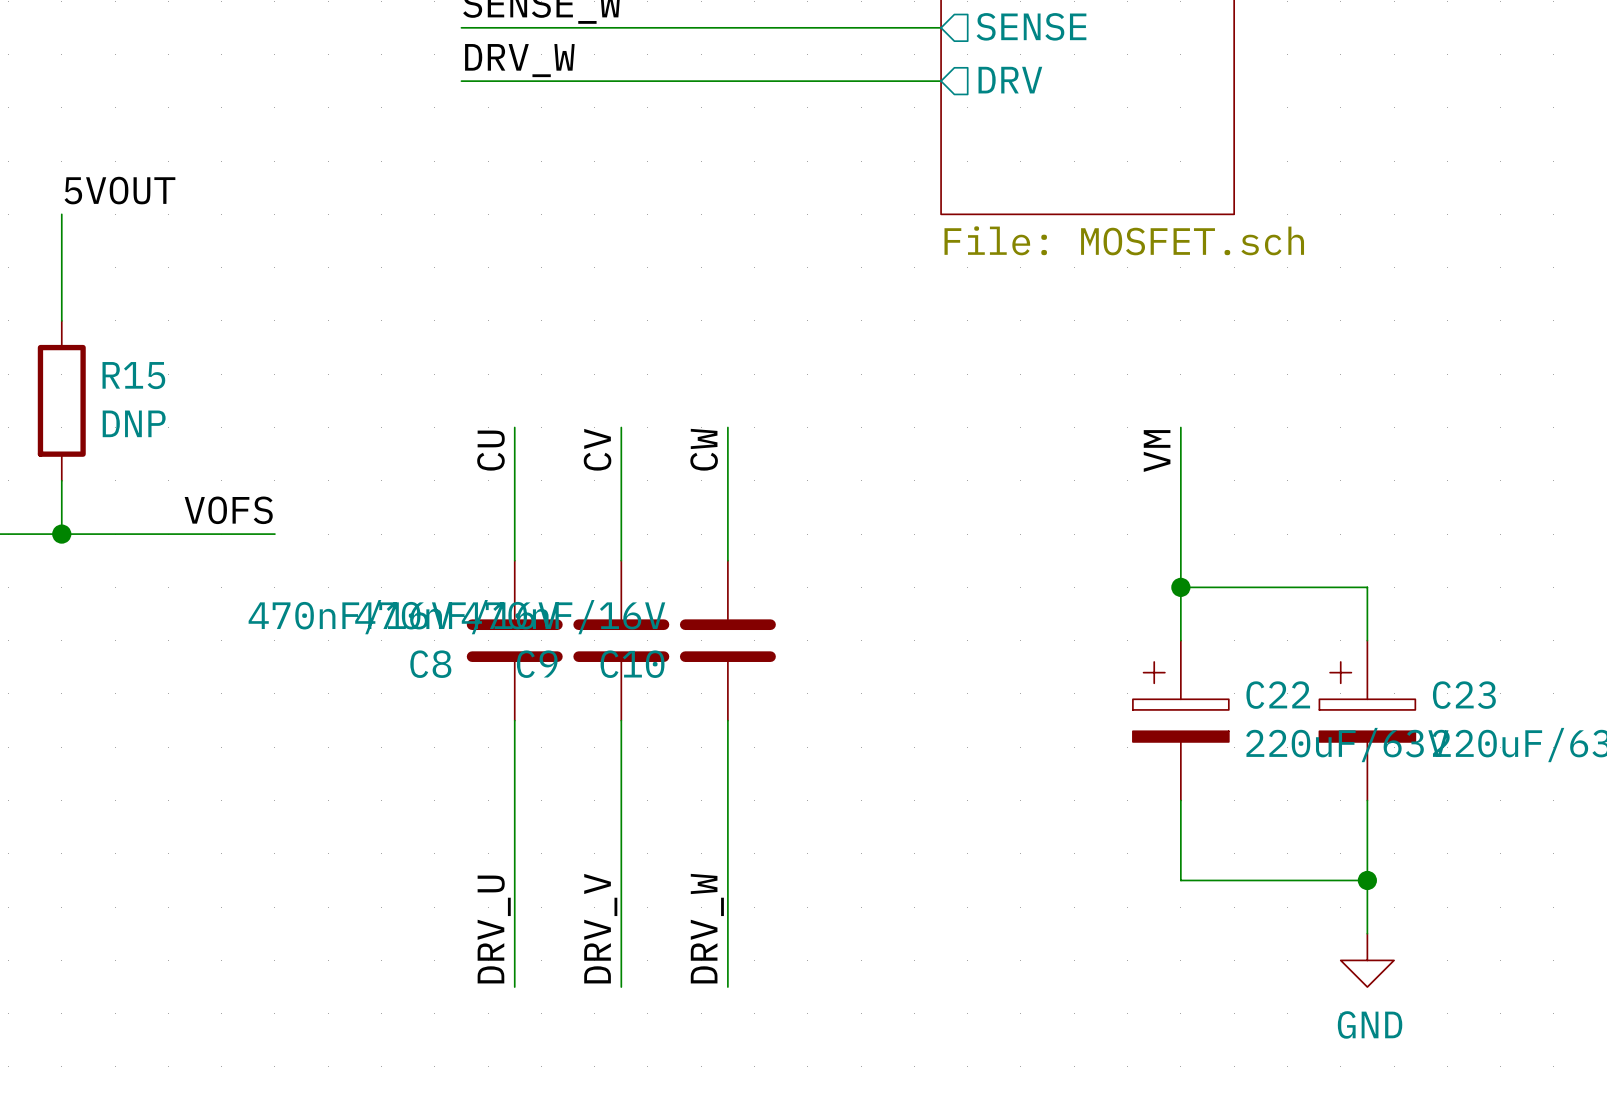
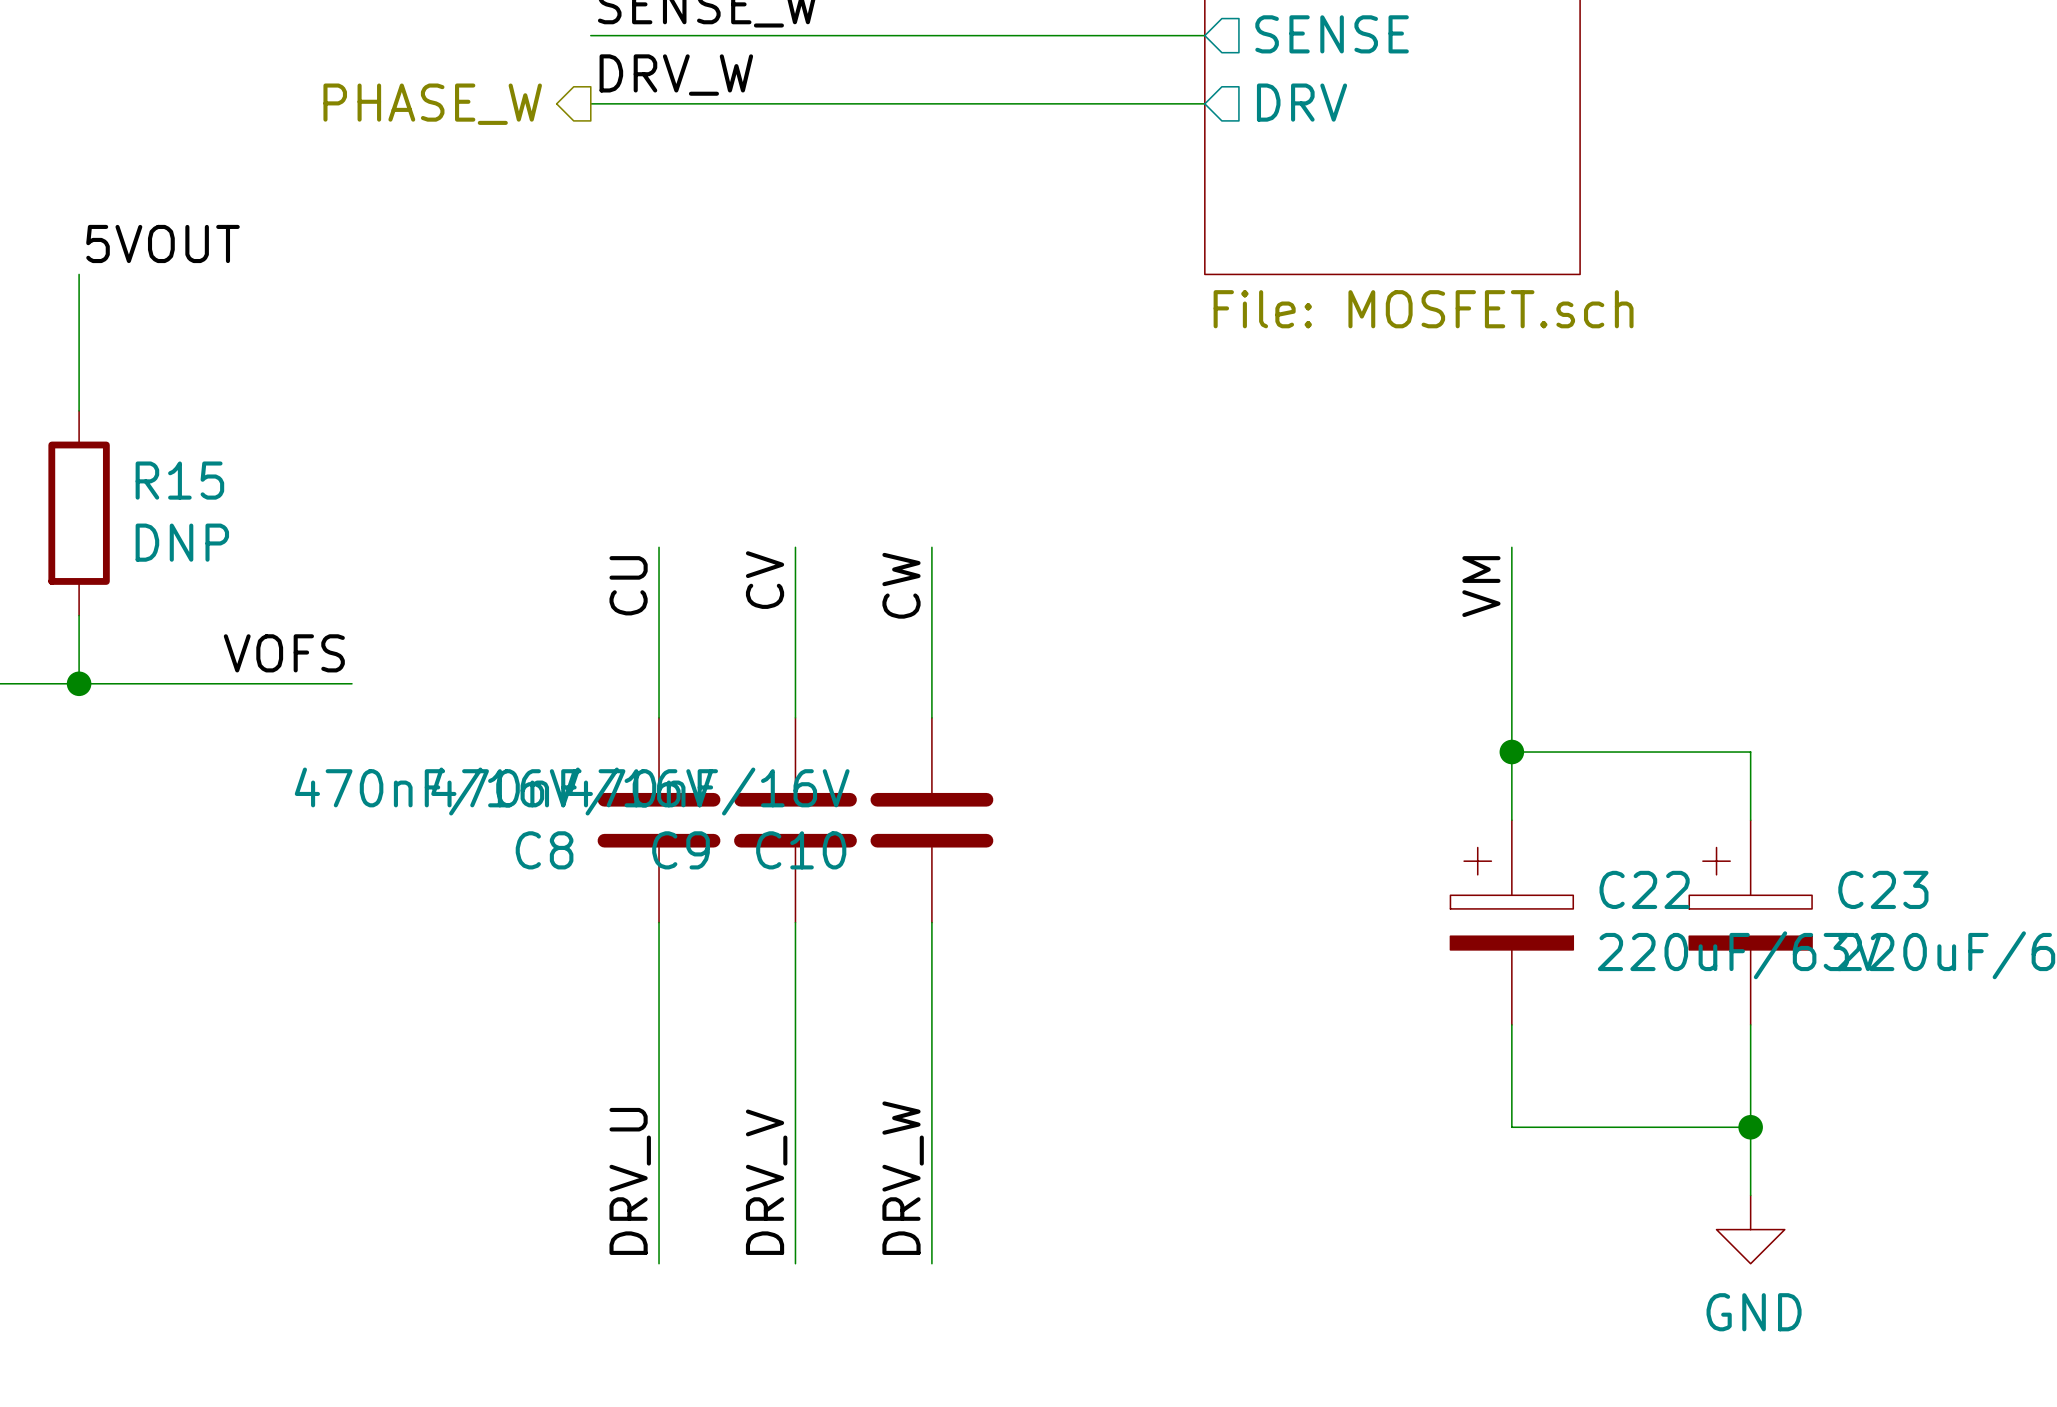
hierarchical label: none -> PHASE_W (432, 104)

